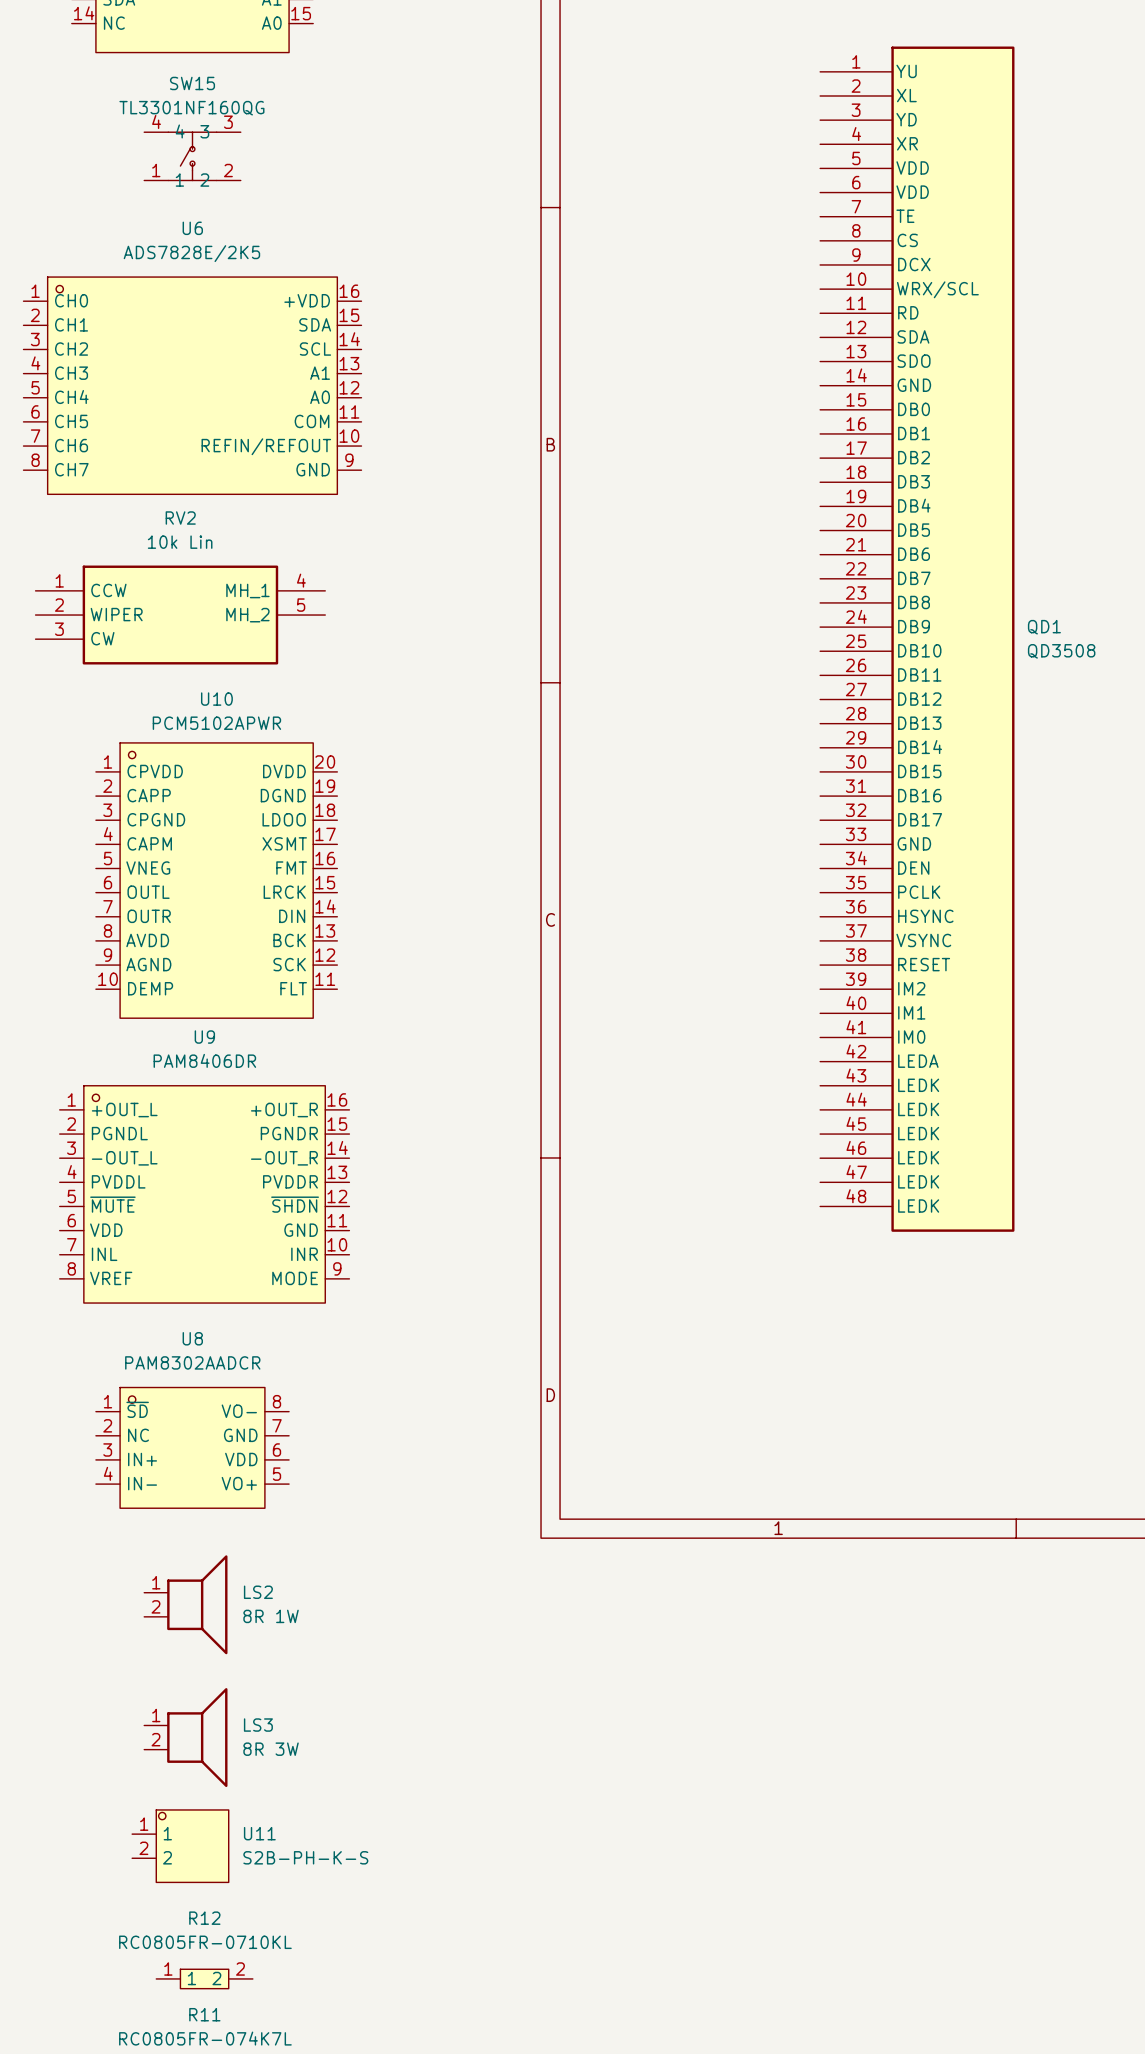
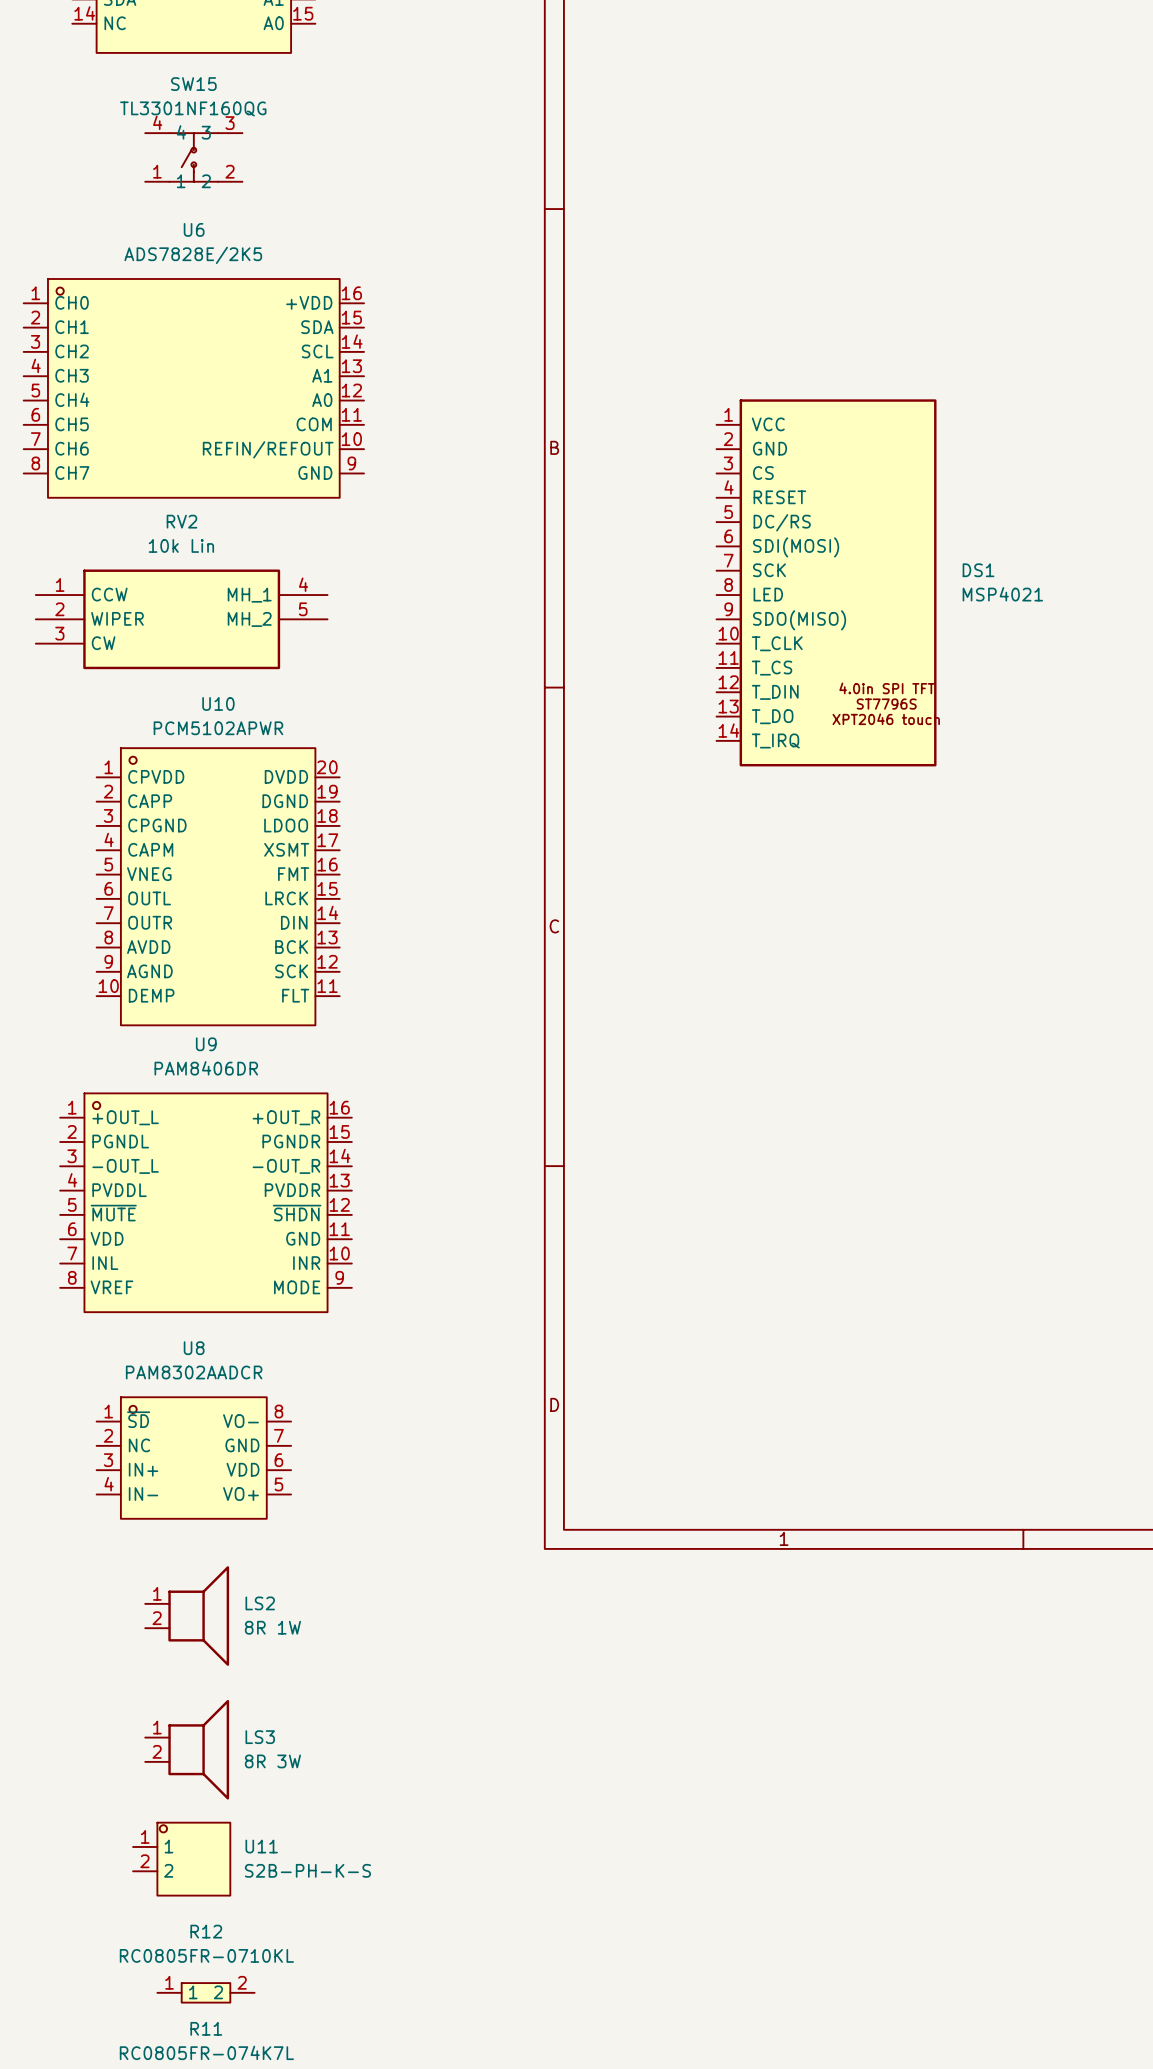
DS1: none -> MSP4021 (826, 582)
QD1: QD3508 (917, 639) -> none

